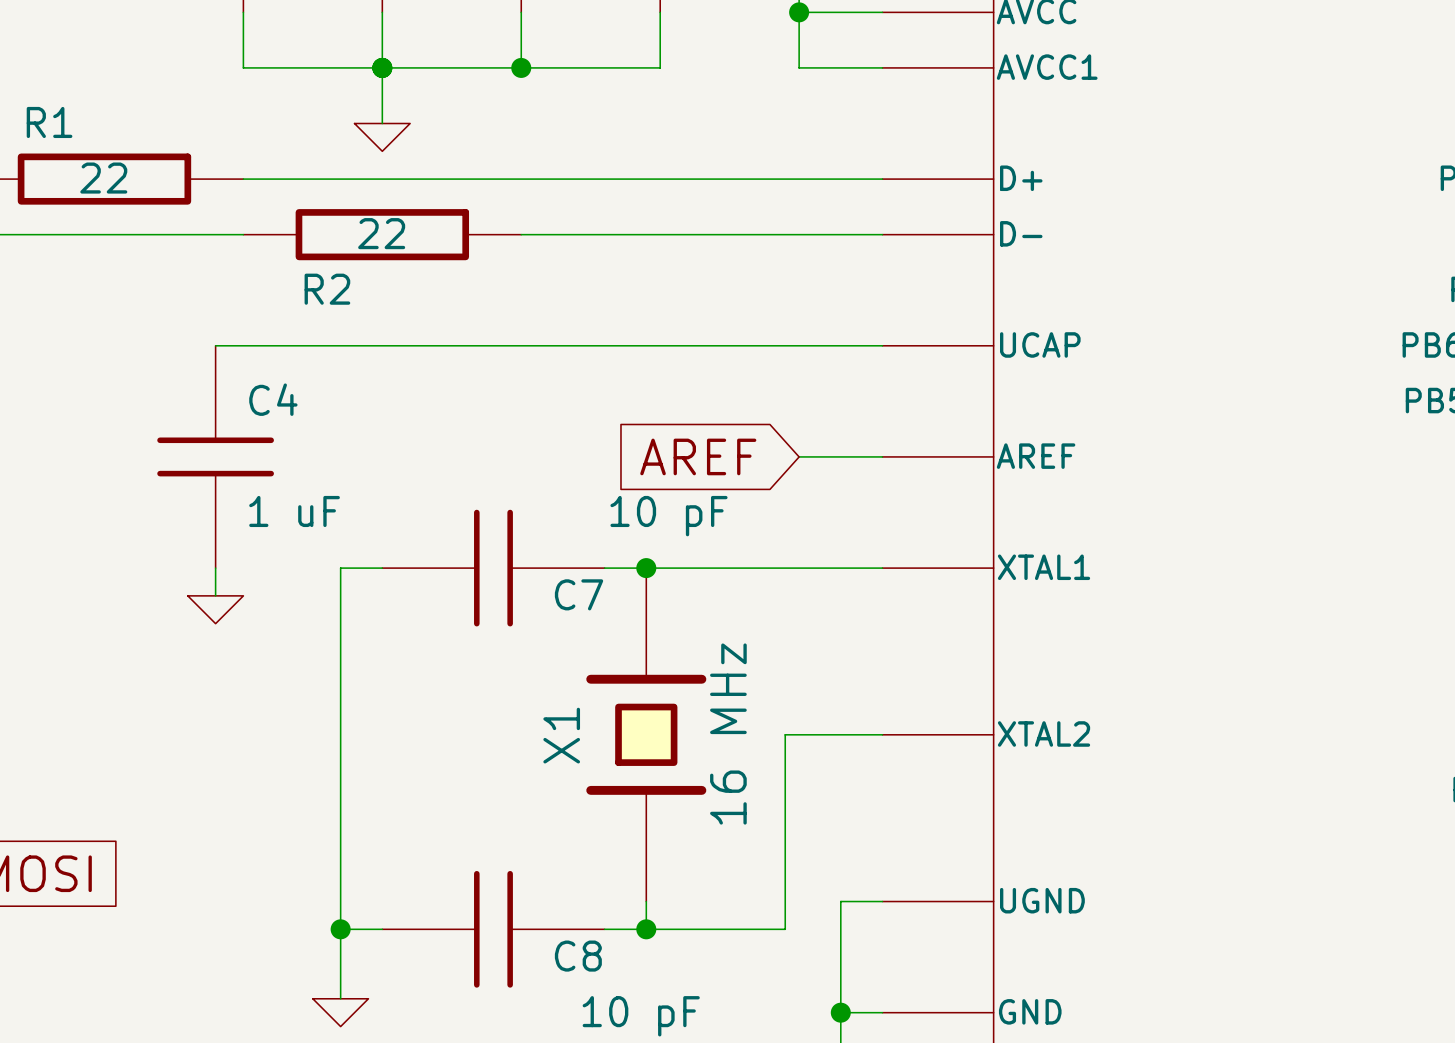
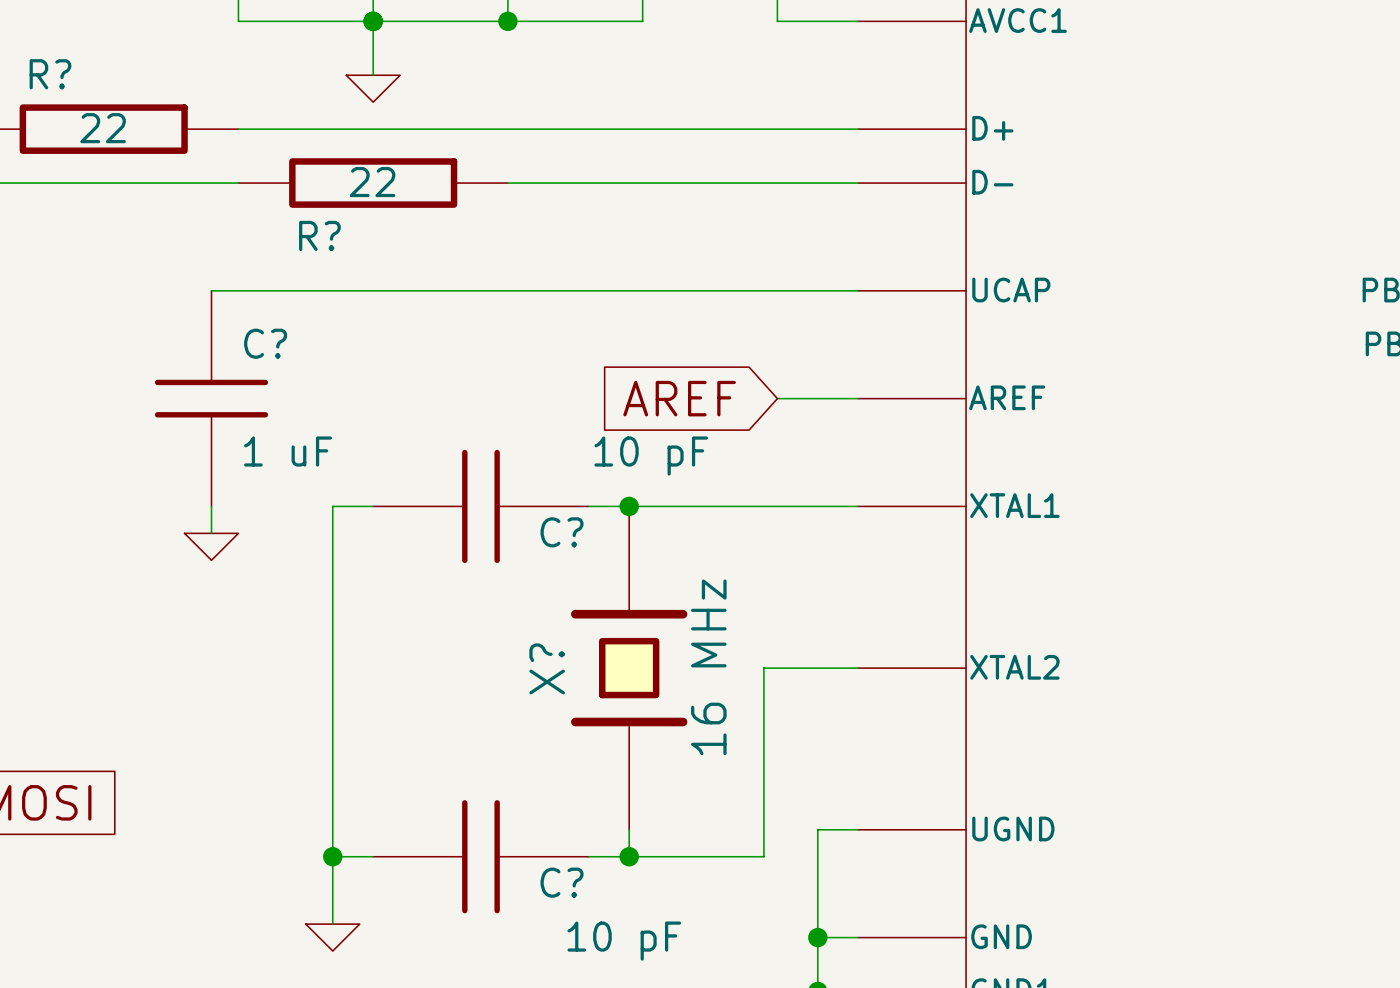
R1 name: R1 (49, 122) -> R? (50, 74)
R2 name: R2 (327, 289) -> R? (319, 235)
C4 name: C4 (273, 399) -> C? (265, 343)
C7 name: C7 (579, 594) -> C? (562, 532)
X1 name: X1 (561, 735) -> X? (547, 668)
C8 name: C8 (578, 956) -> C? (562, 882)

